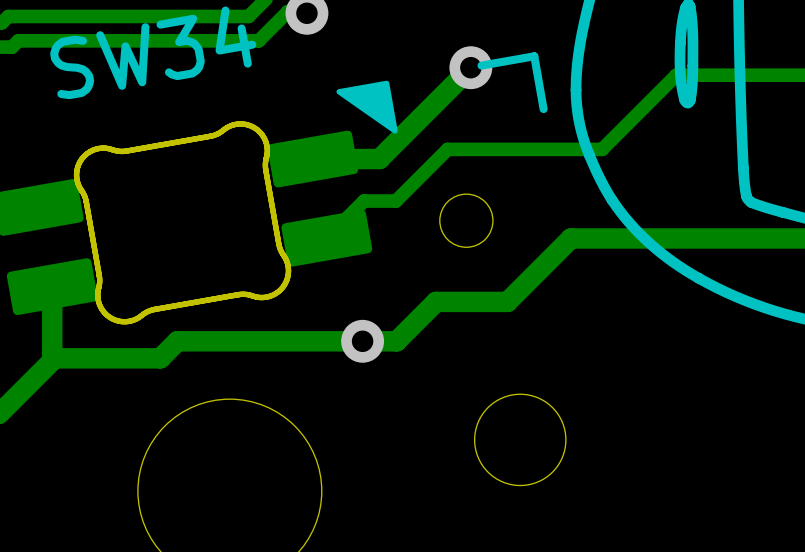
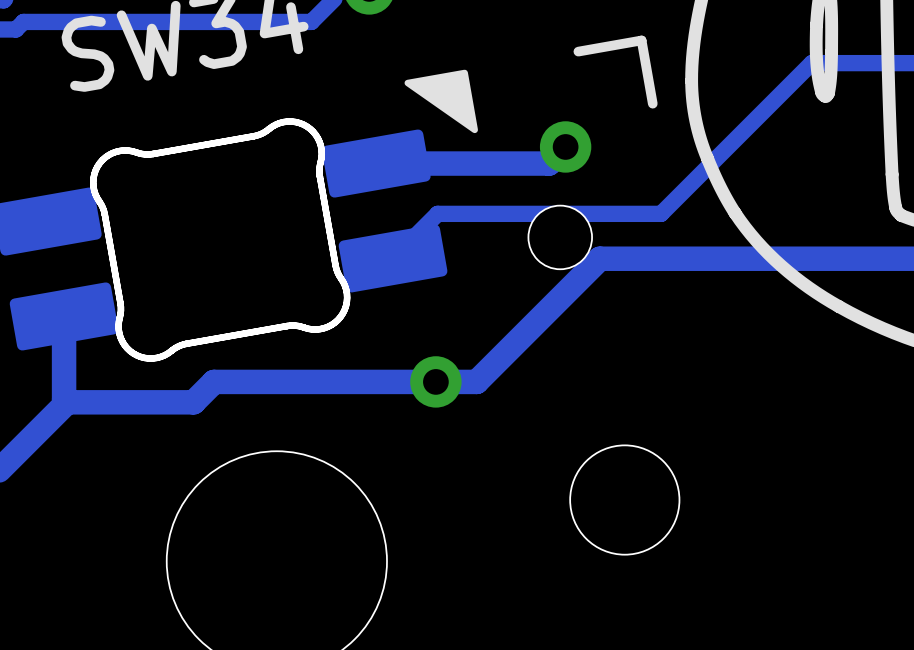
track: (470, 67) (379, 159) -> (565, 146) (549, 163) (456, 163)
via position: (470, 67) -> (565, 146)
track: (602, 149) (447, 149) (395, 201) -> (722, 152) (661, 213) (475, 213)
track: (570, 238) (507, 301) (436, 301) -> (685, 258) (599, 258) (523, 334)

